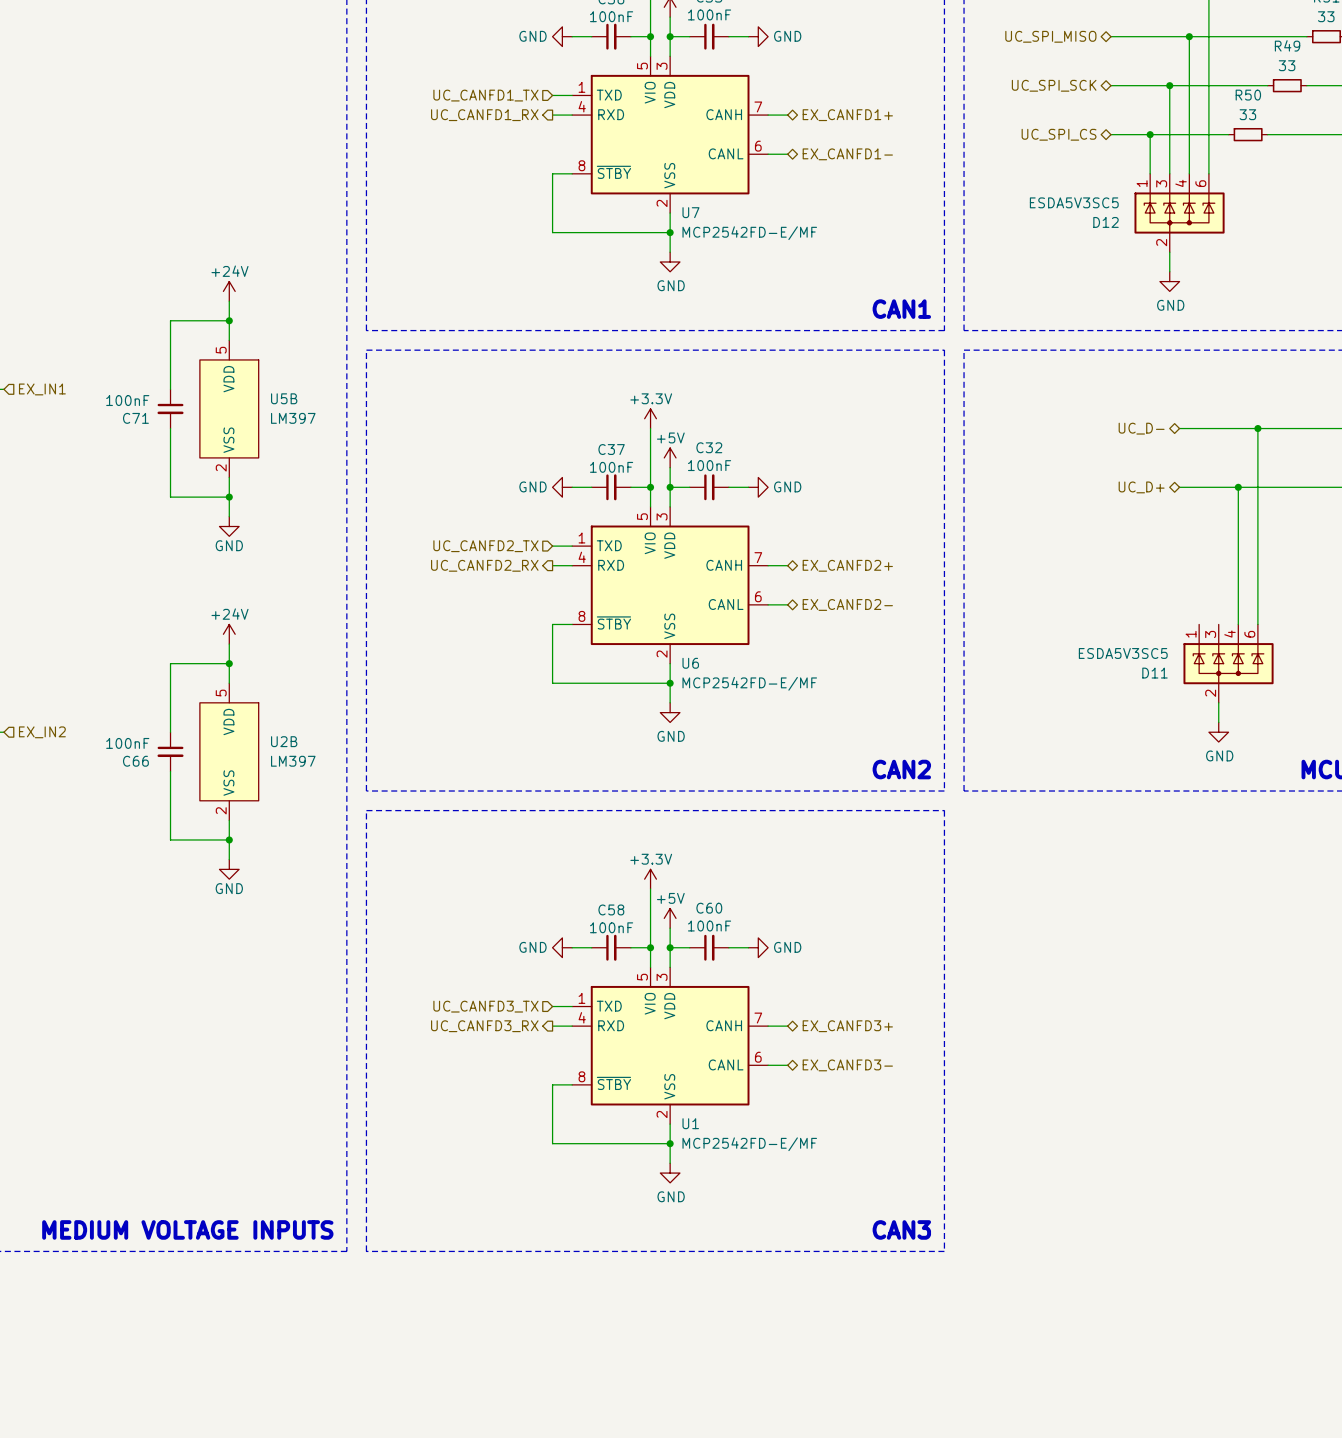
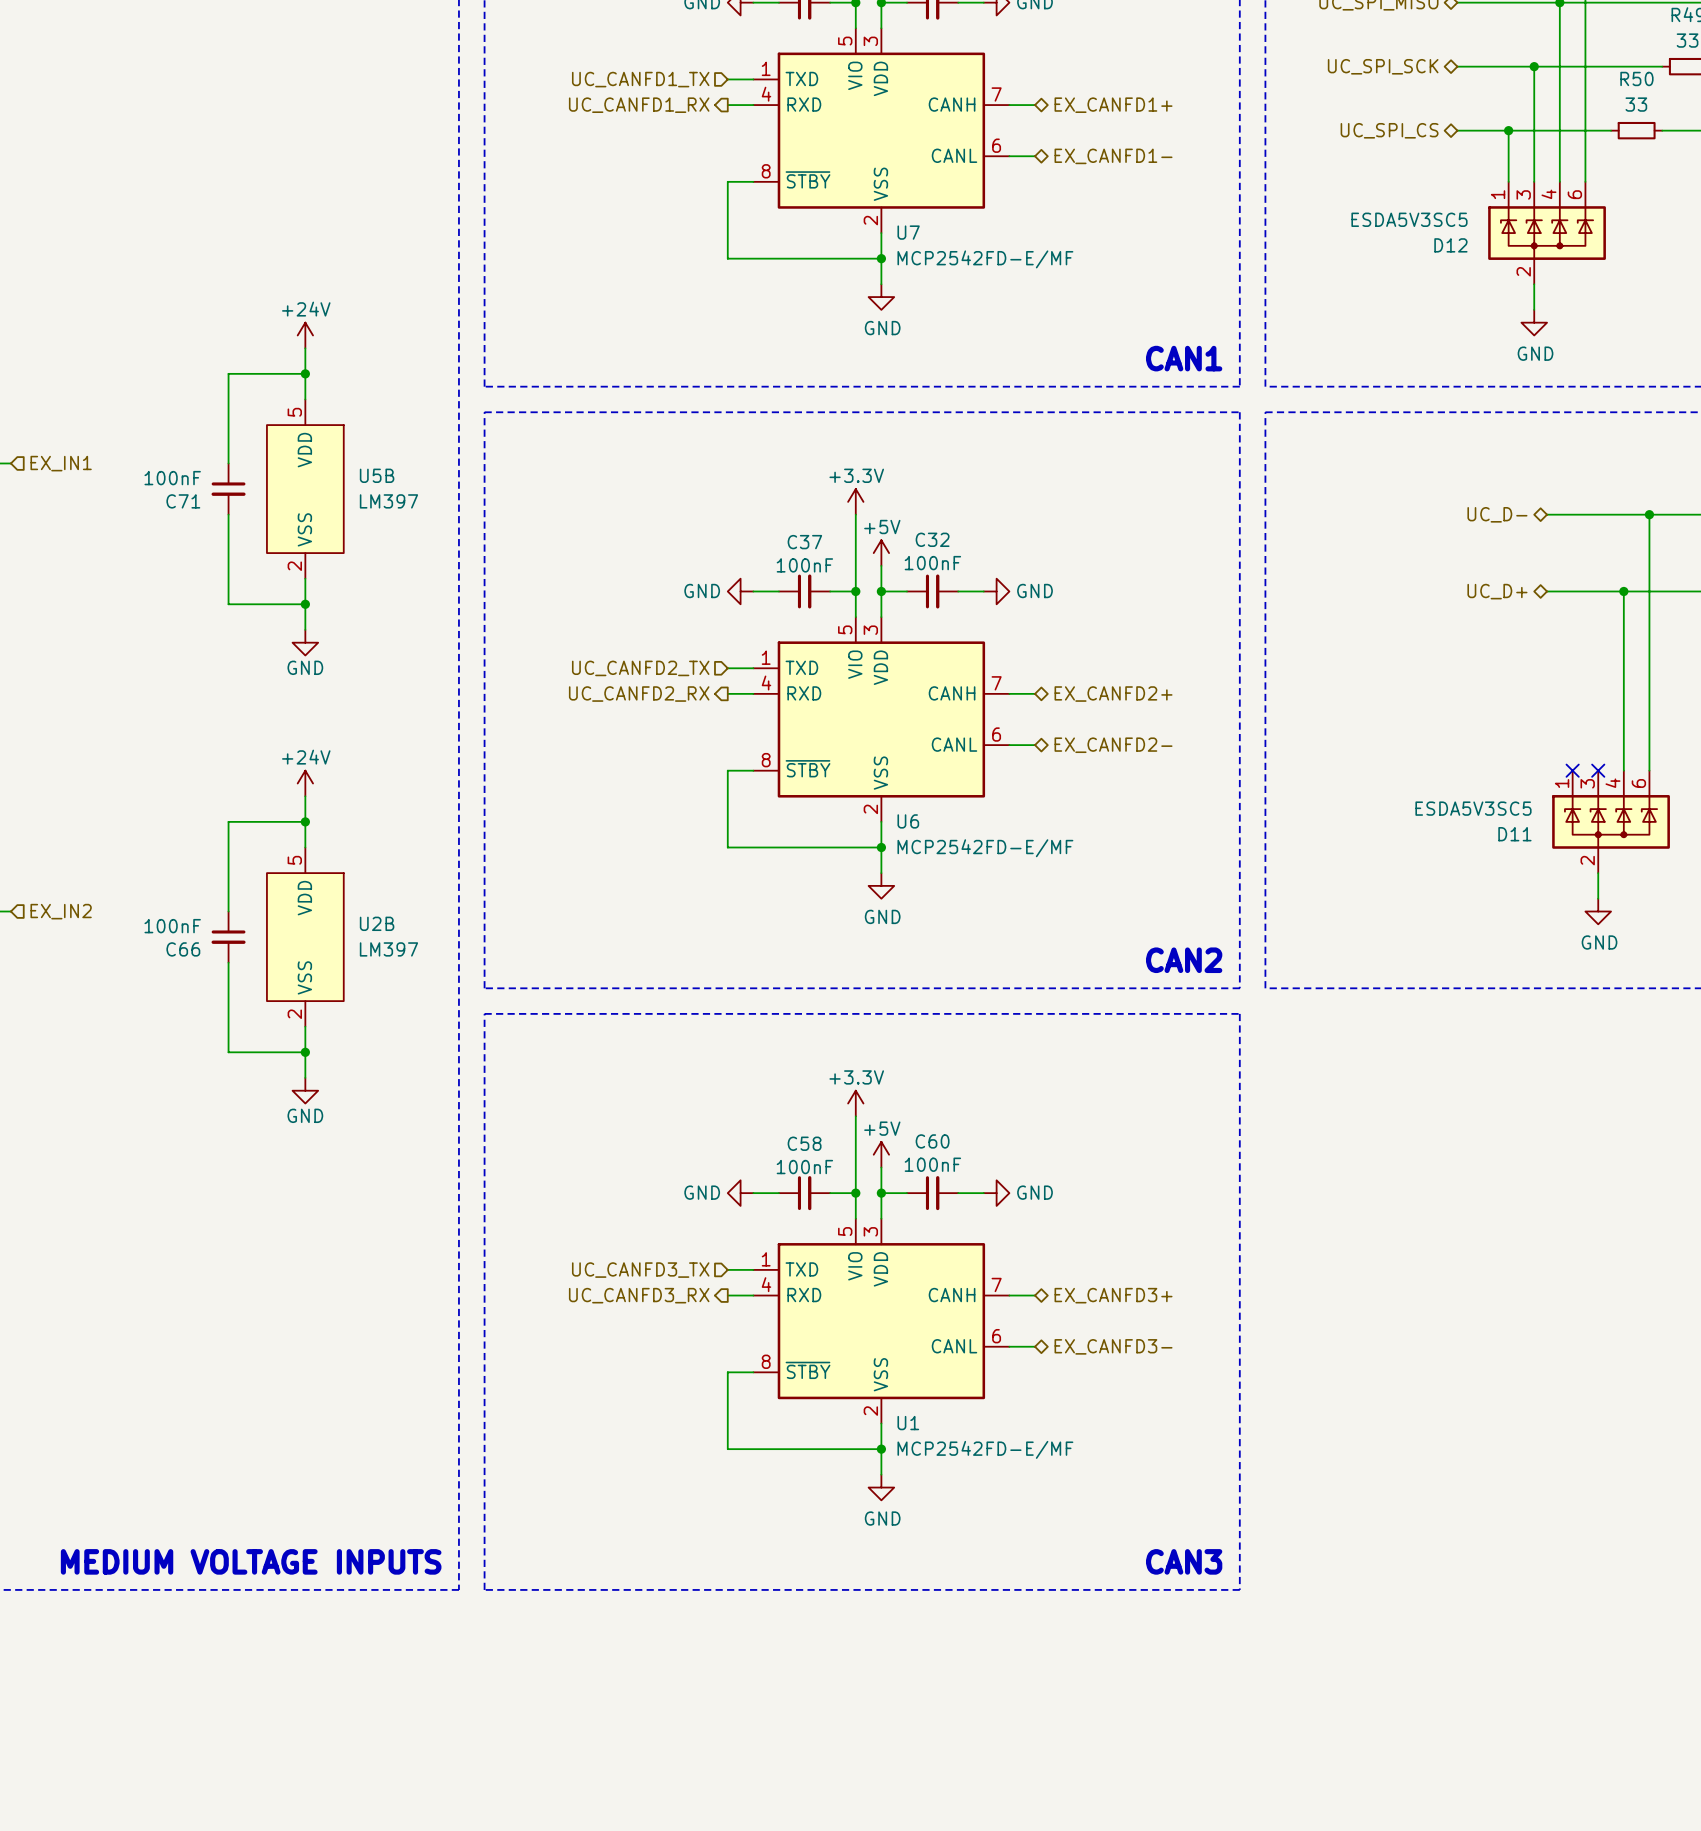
no-connect mark: none -> (1572, 770)
no-connect mark: none -> (1598, 770)

